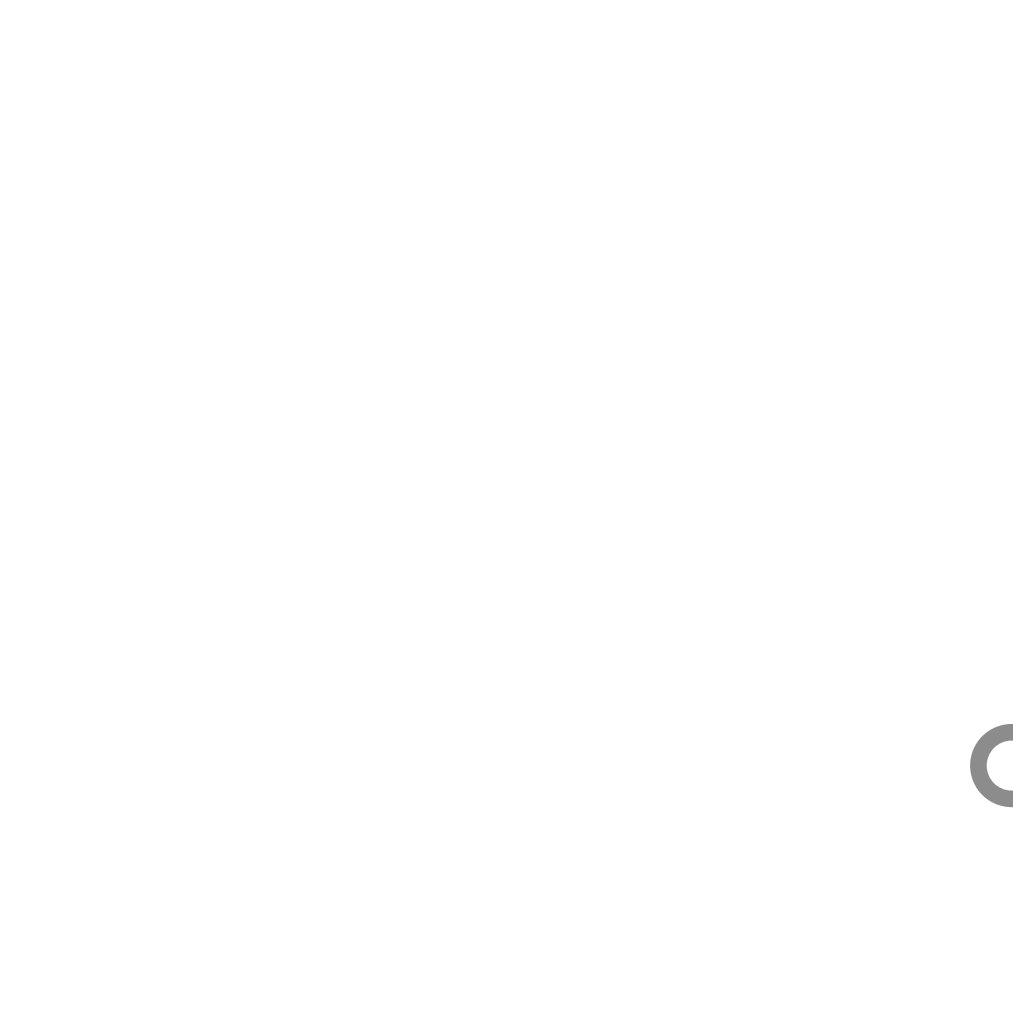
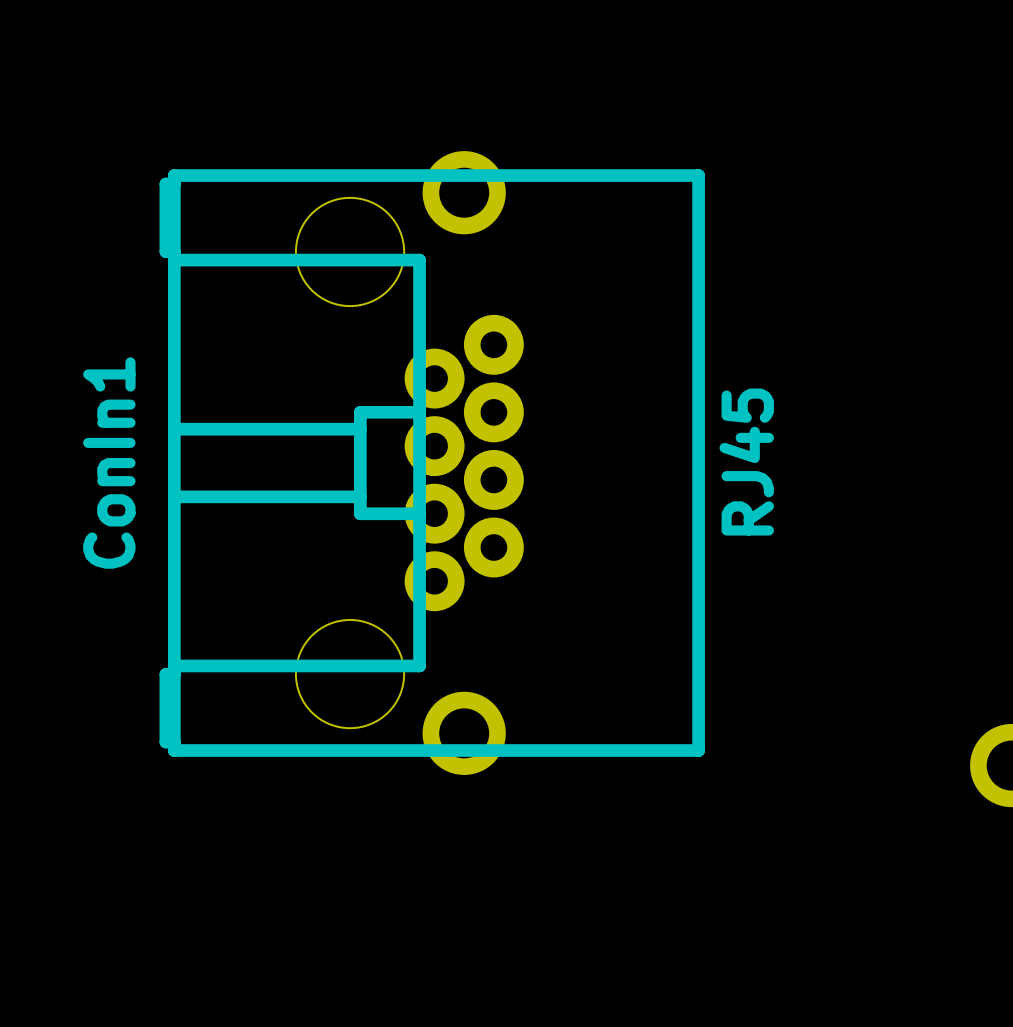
ConIn1: none -> RJ45 (432, 463)

